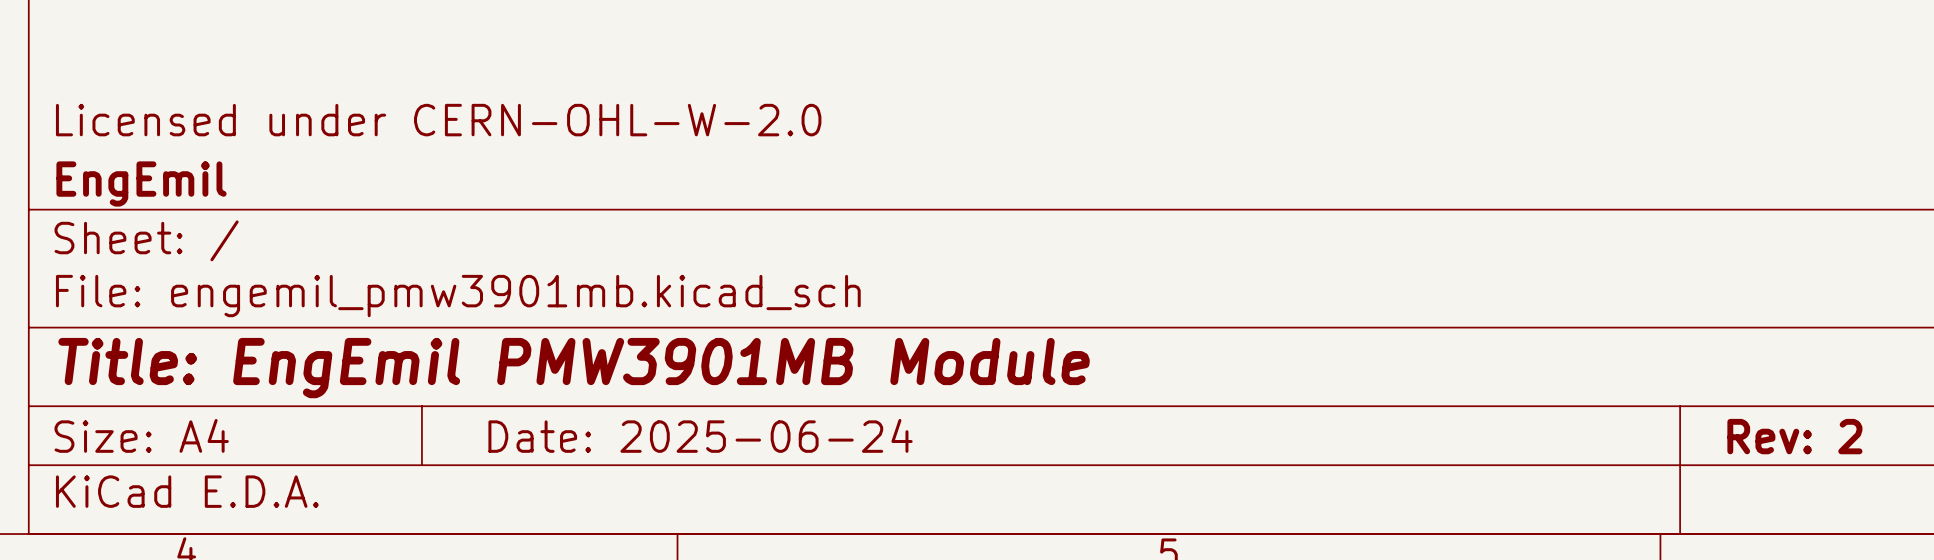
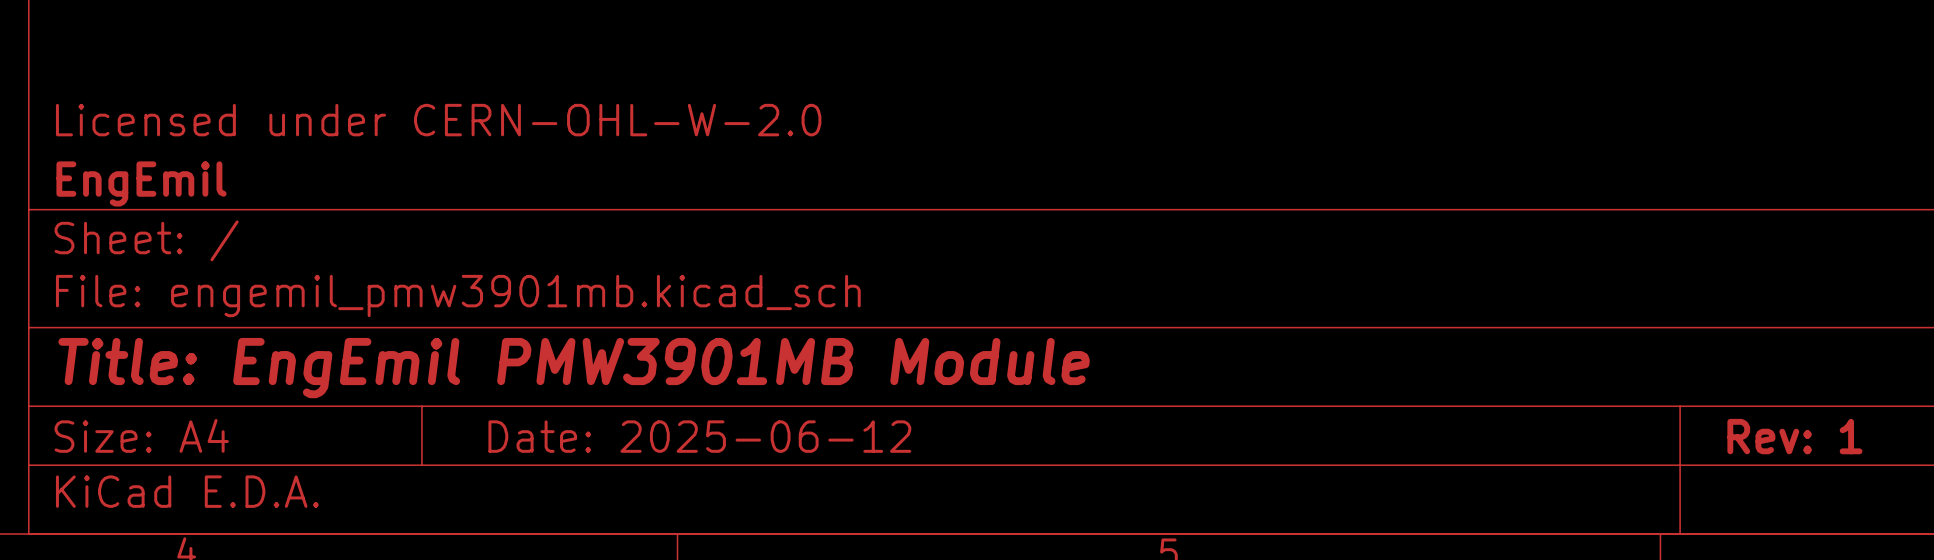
title block: Date: 2025-06-24 (700, 435) -> Date: 2025-06-12 (699, 436)
title block: Rev: 2 (1794, 436) -> Rev: 1 (1794, 436)

